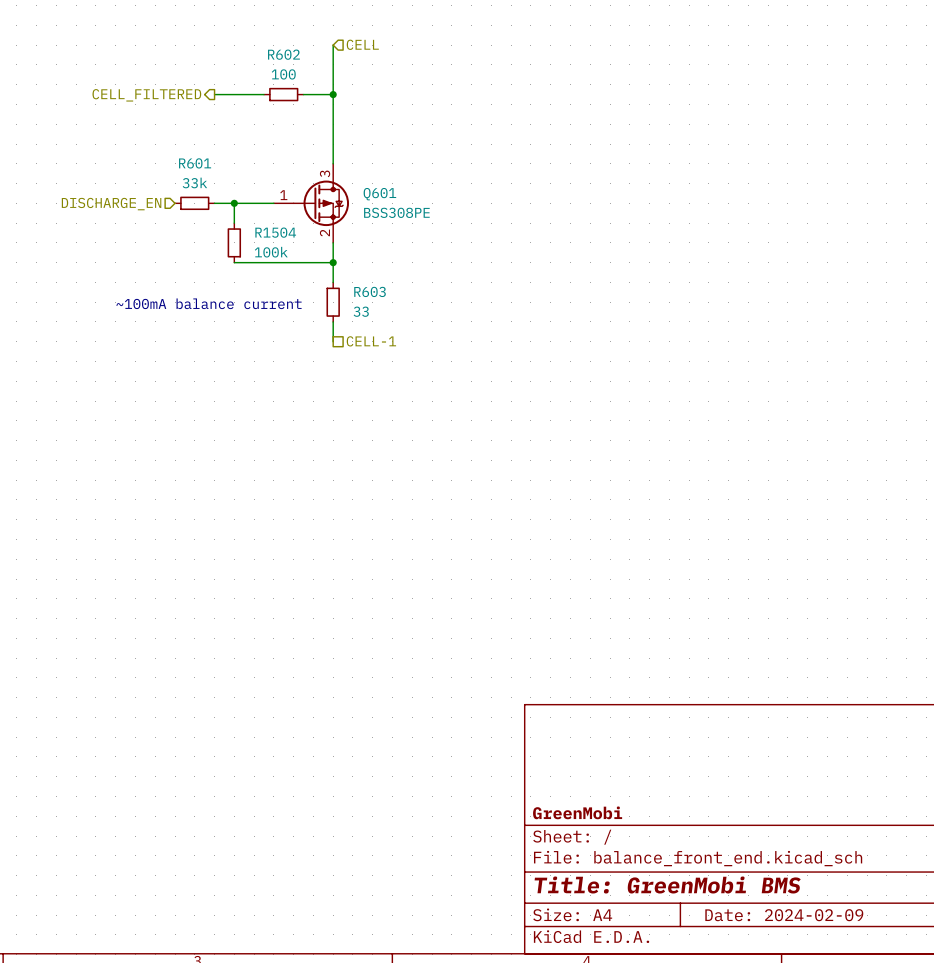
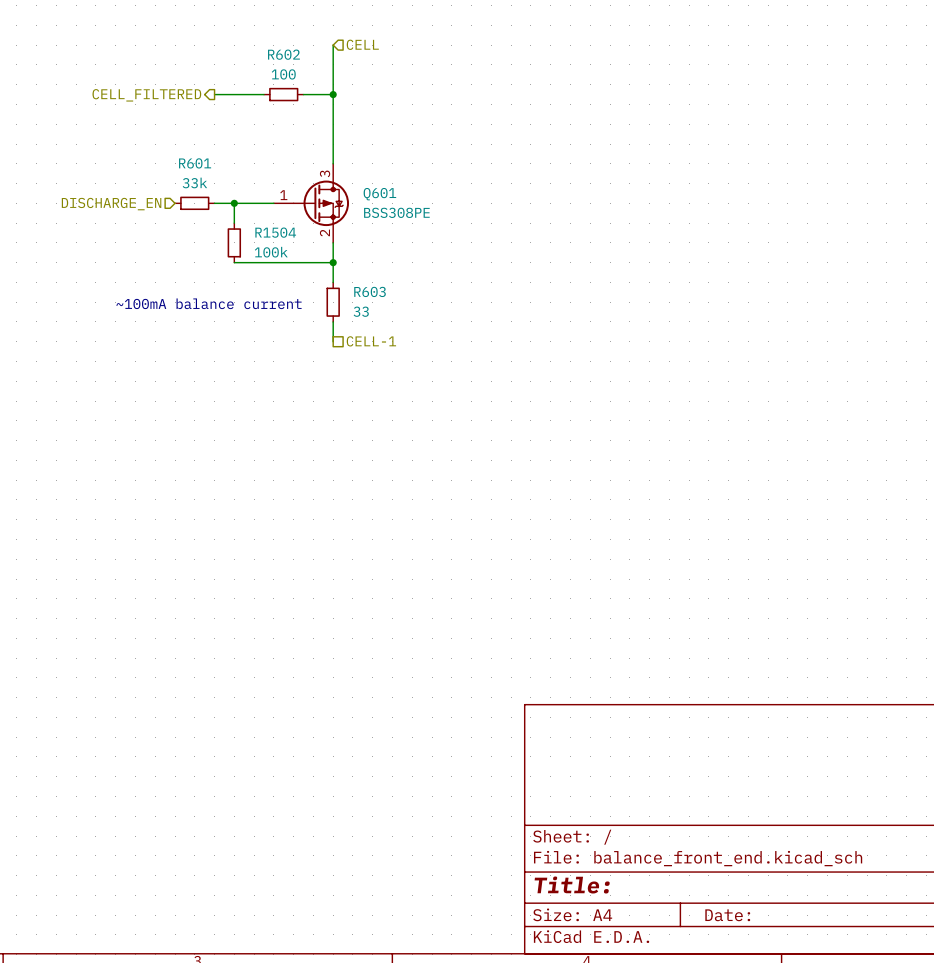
title block: GreenMobi (577, 812) -> none
title block: Title: GreenMobi BMS (667, 885) -> Title: (572, 885)
title block: Date: 2024-02-09 (784, 915) -> Date: (727, 915)

